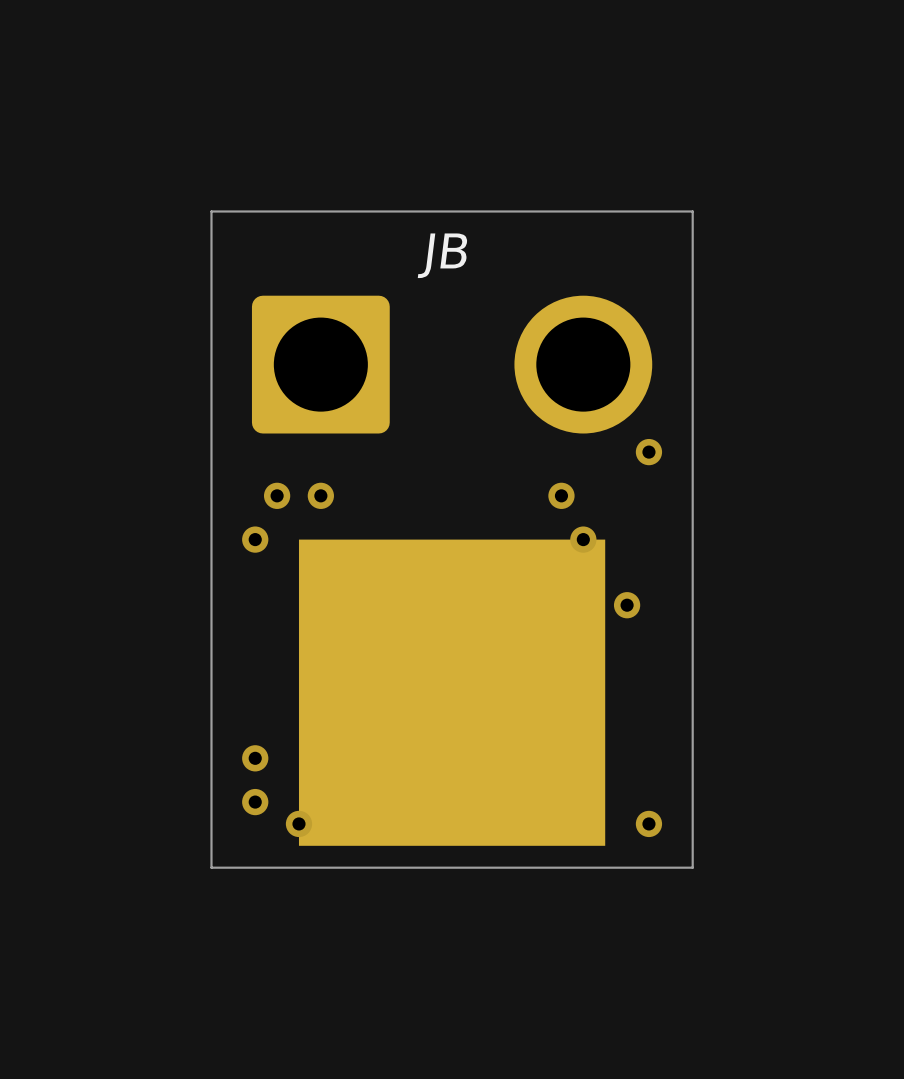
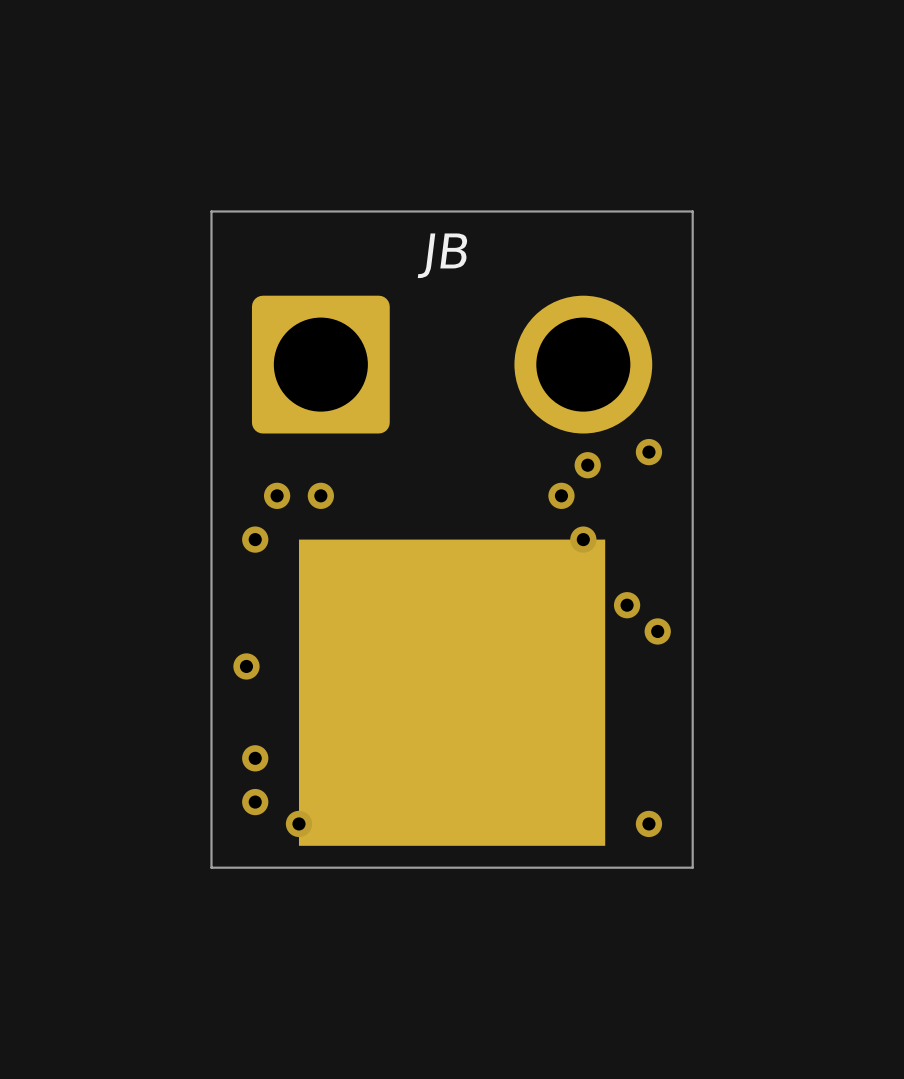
via: none -> (587, 465)
via: none -> (657, 631)
via: none -> (246, 666)

